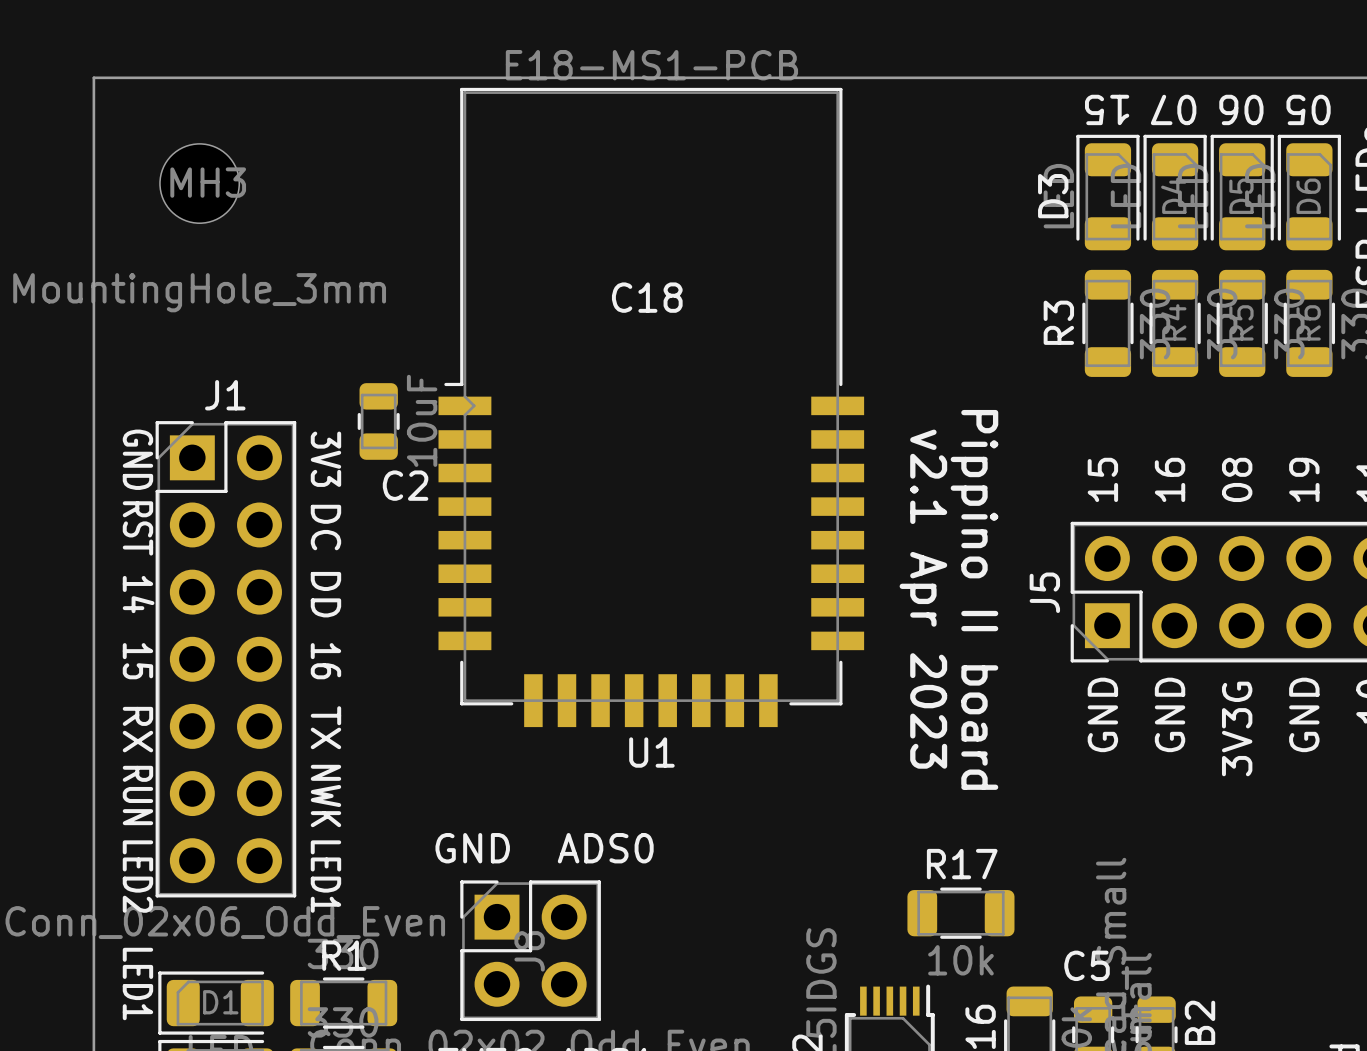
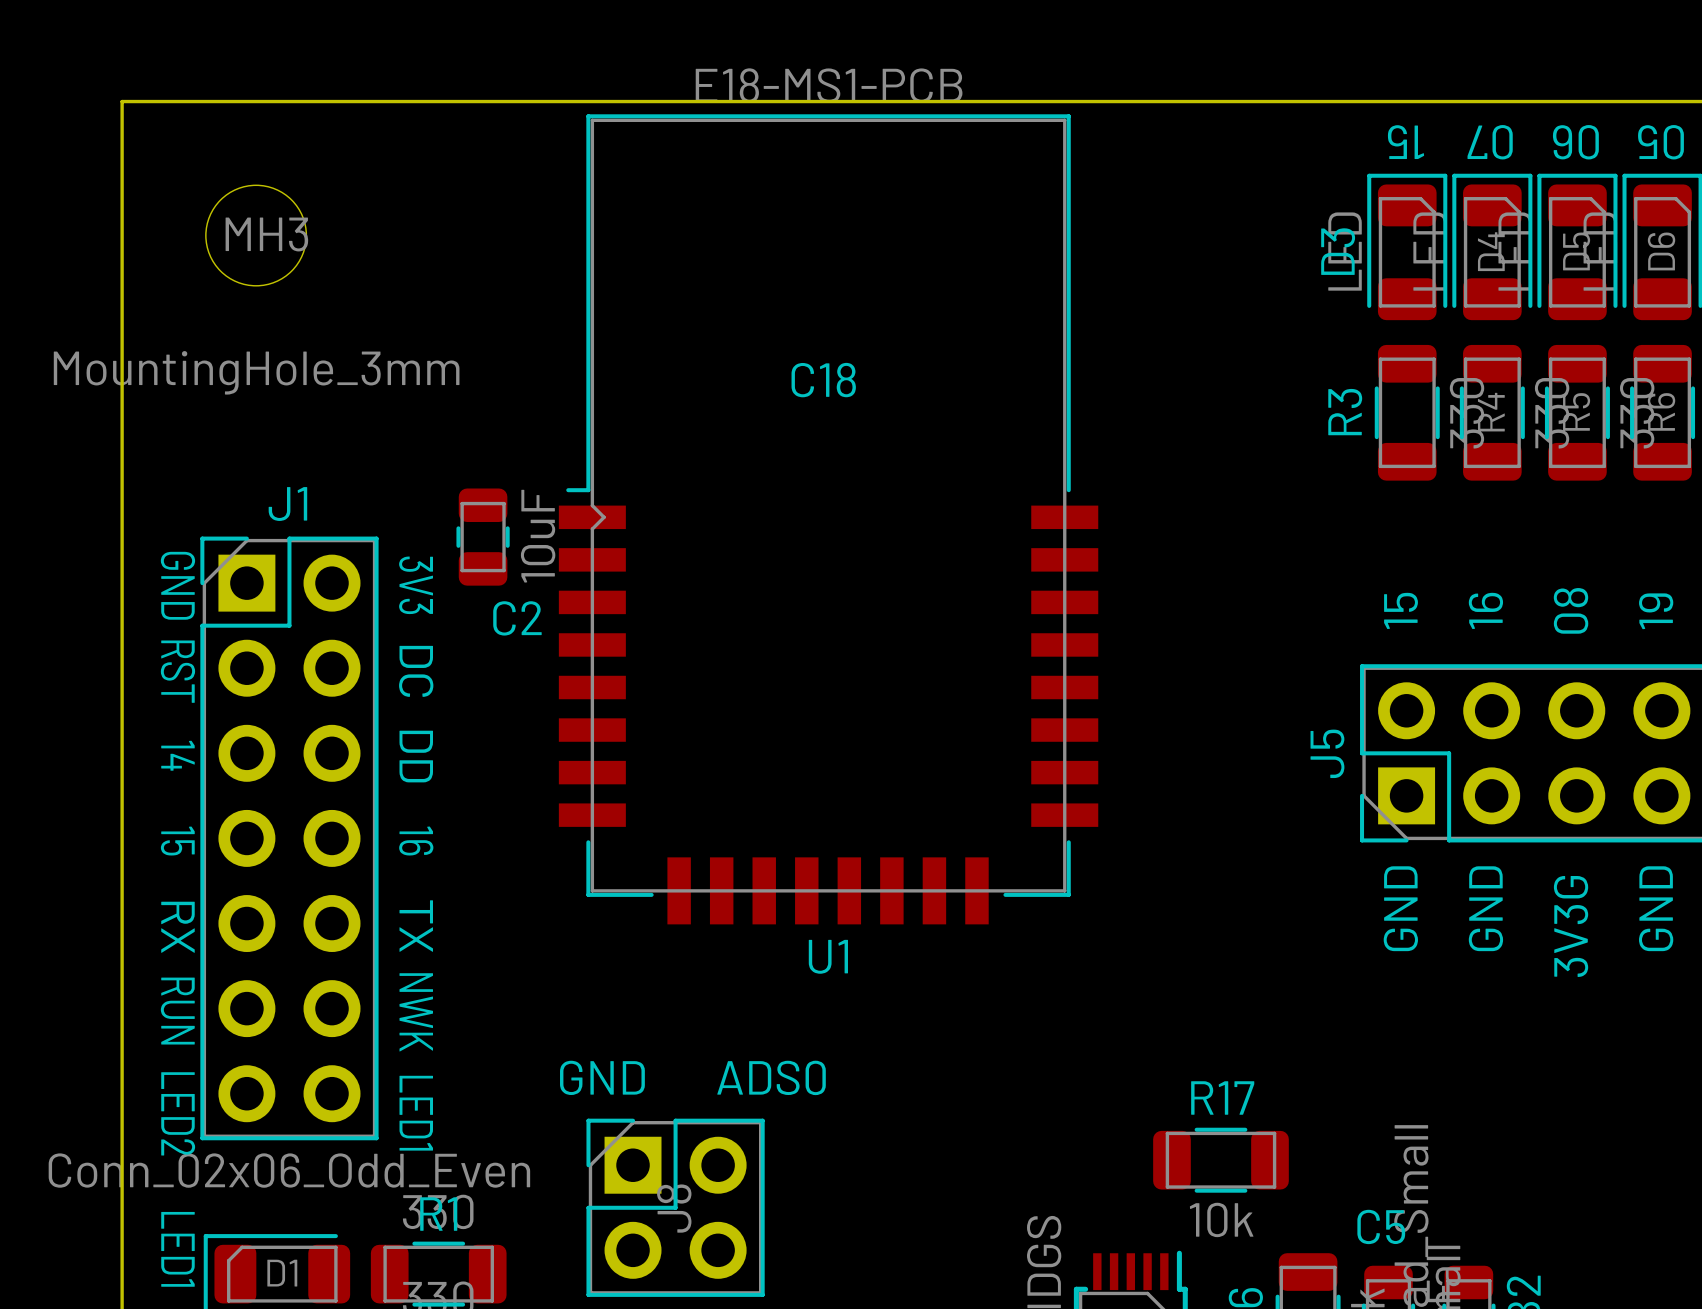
text: v2.1 Apr 2023 (923, 599) -> none
text: Pippino II board (974, 599) -> none

